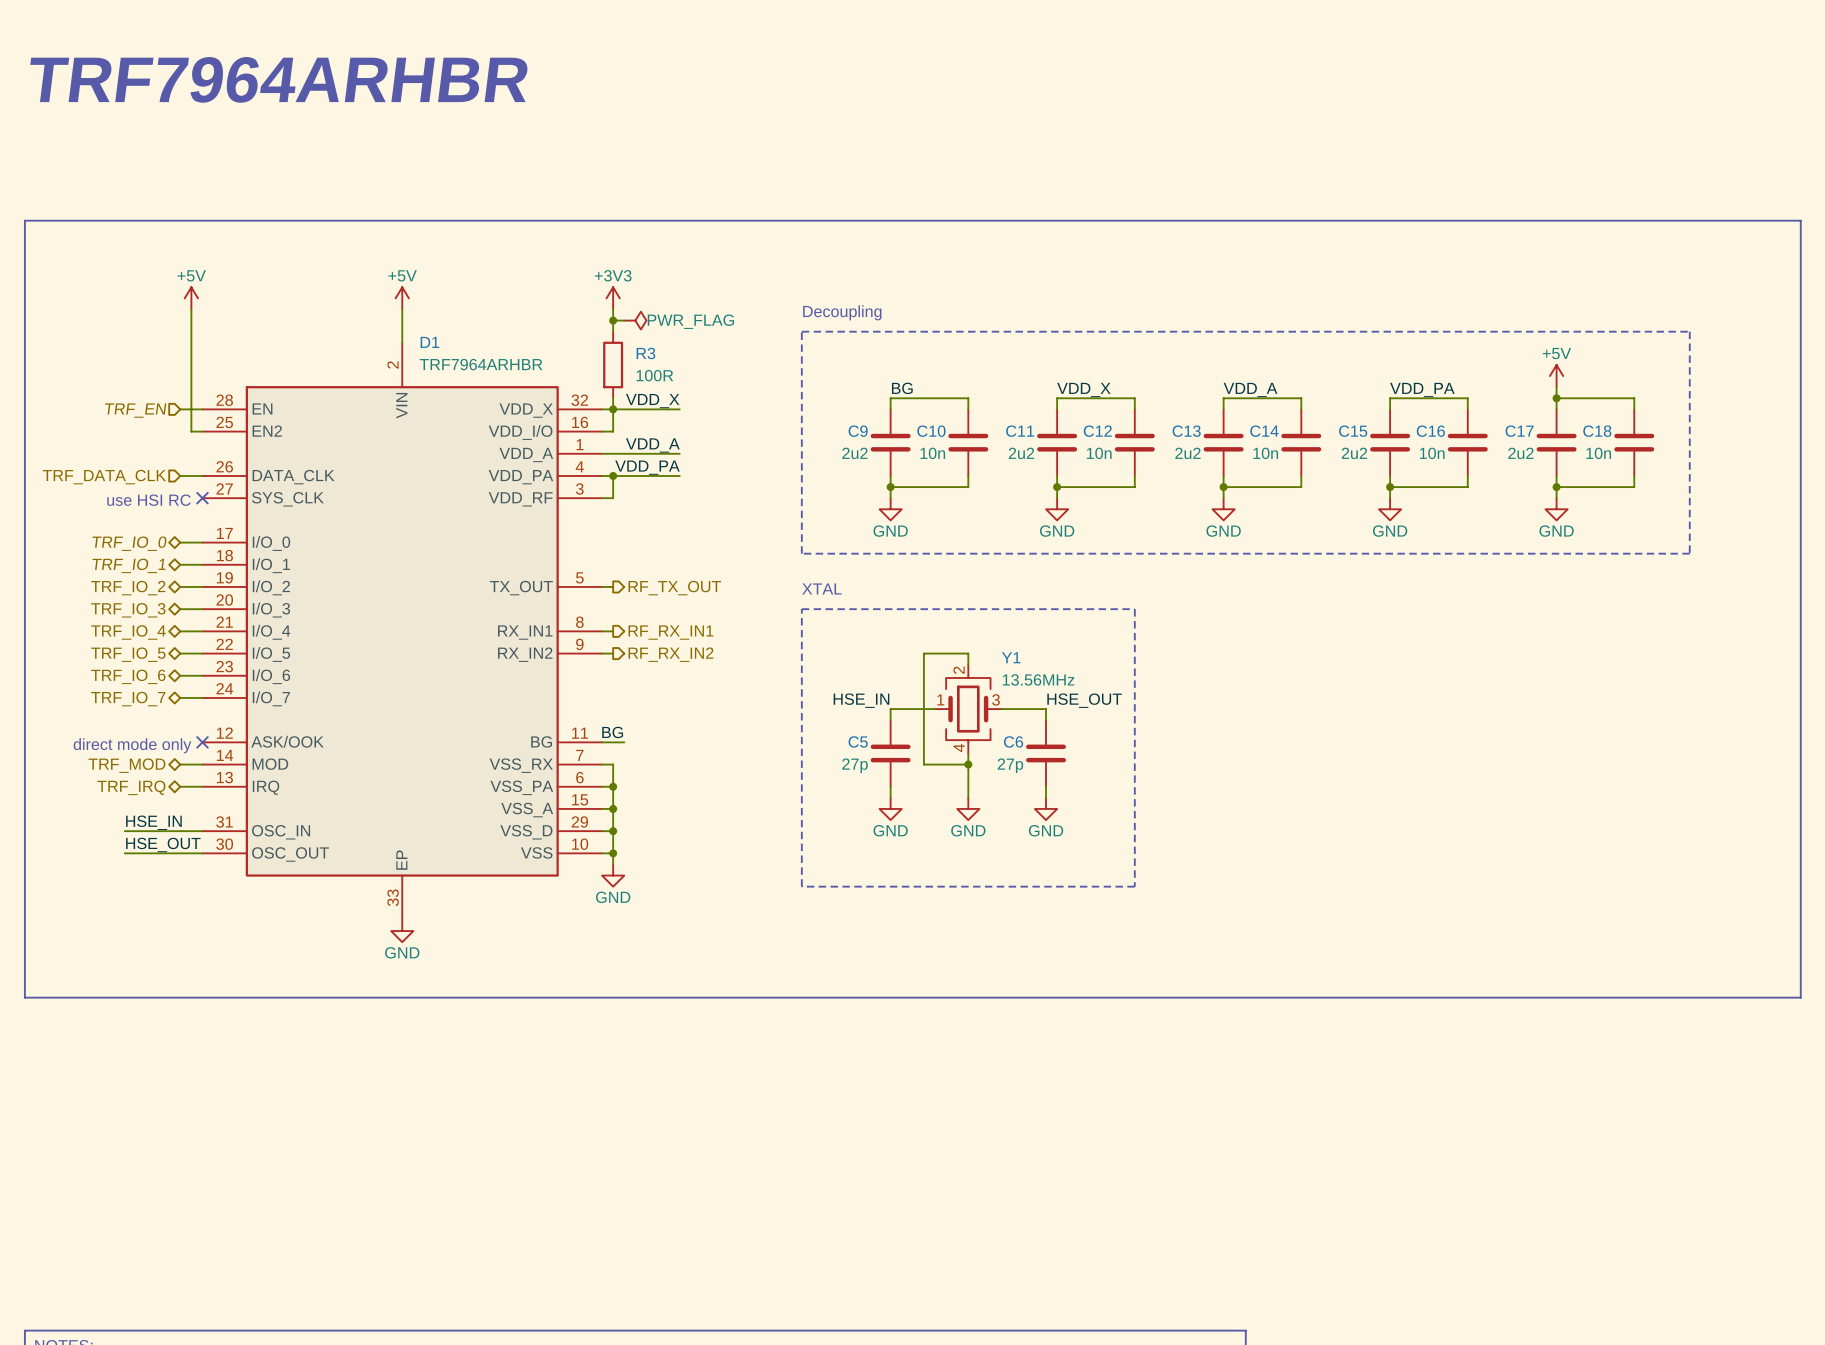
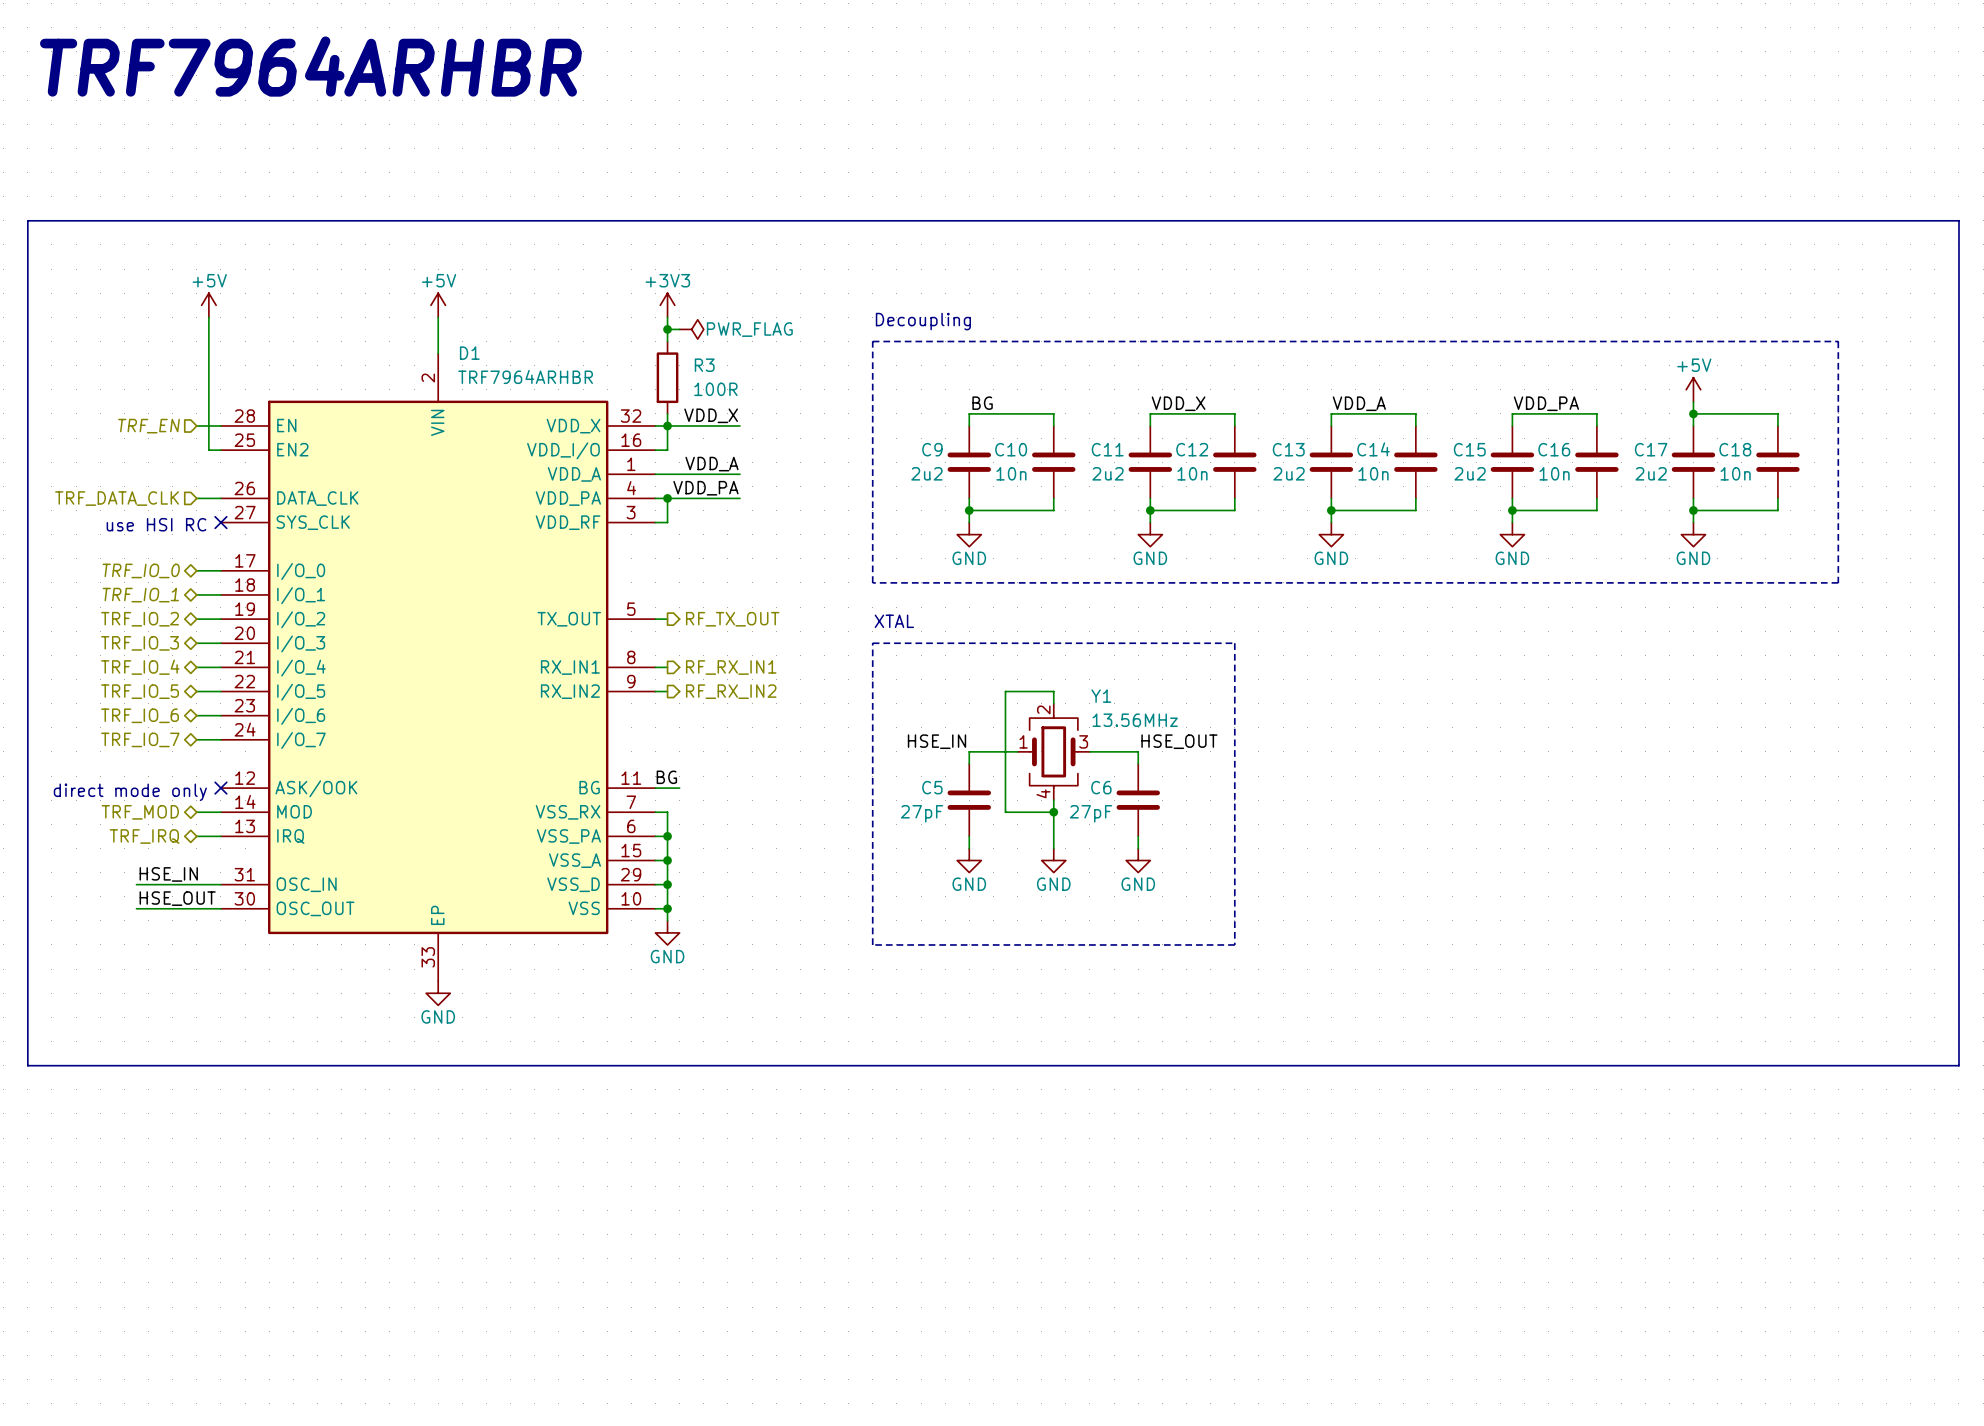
C5 value: 27p (855, 765) -> 27pF (922, 813)
C6 value: 27p (1010, 765) -> 27pF (1091, 813)

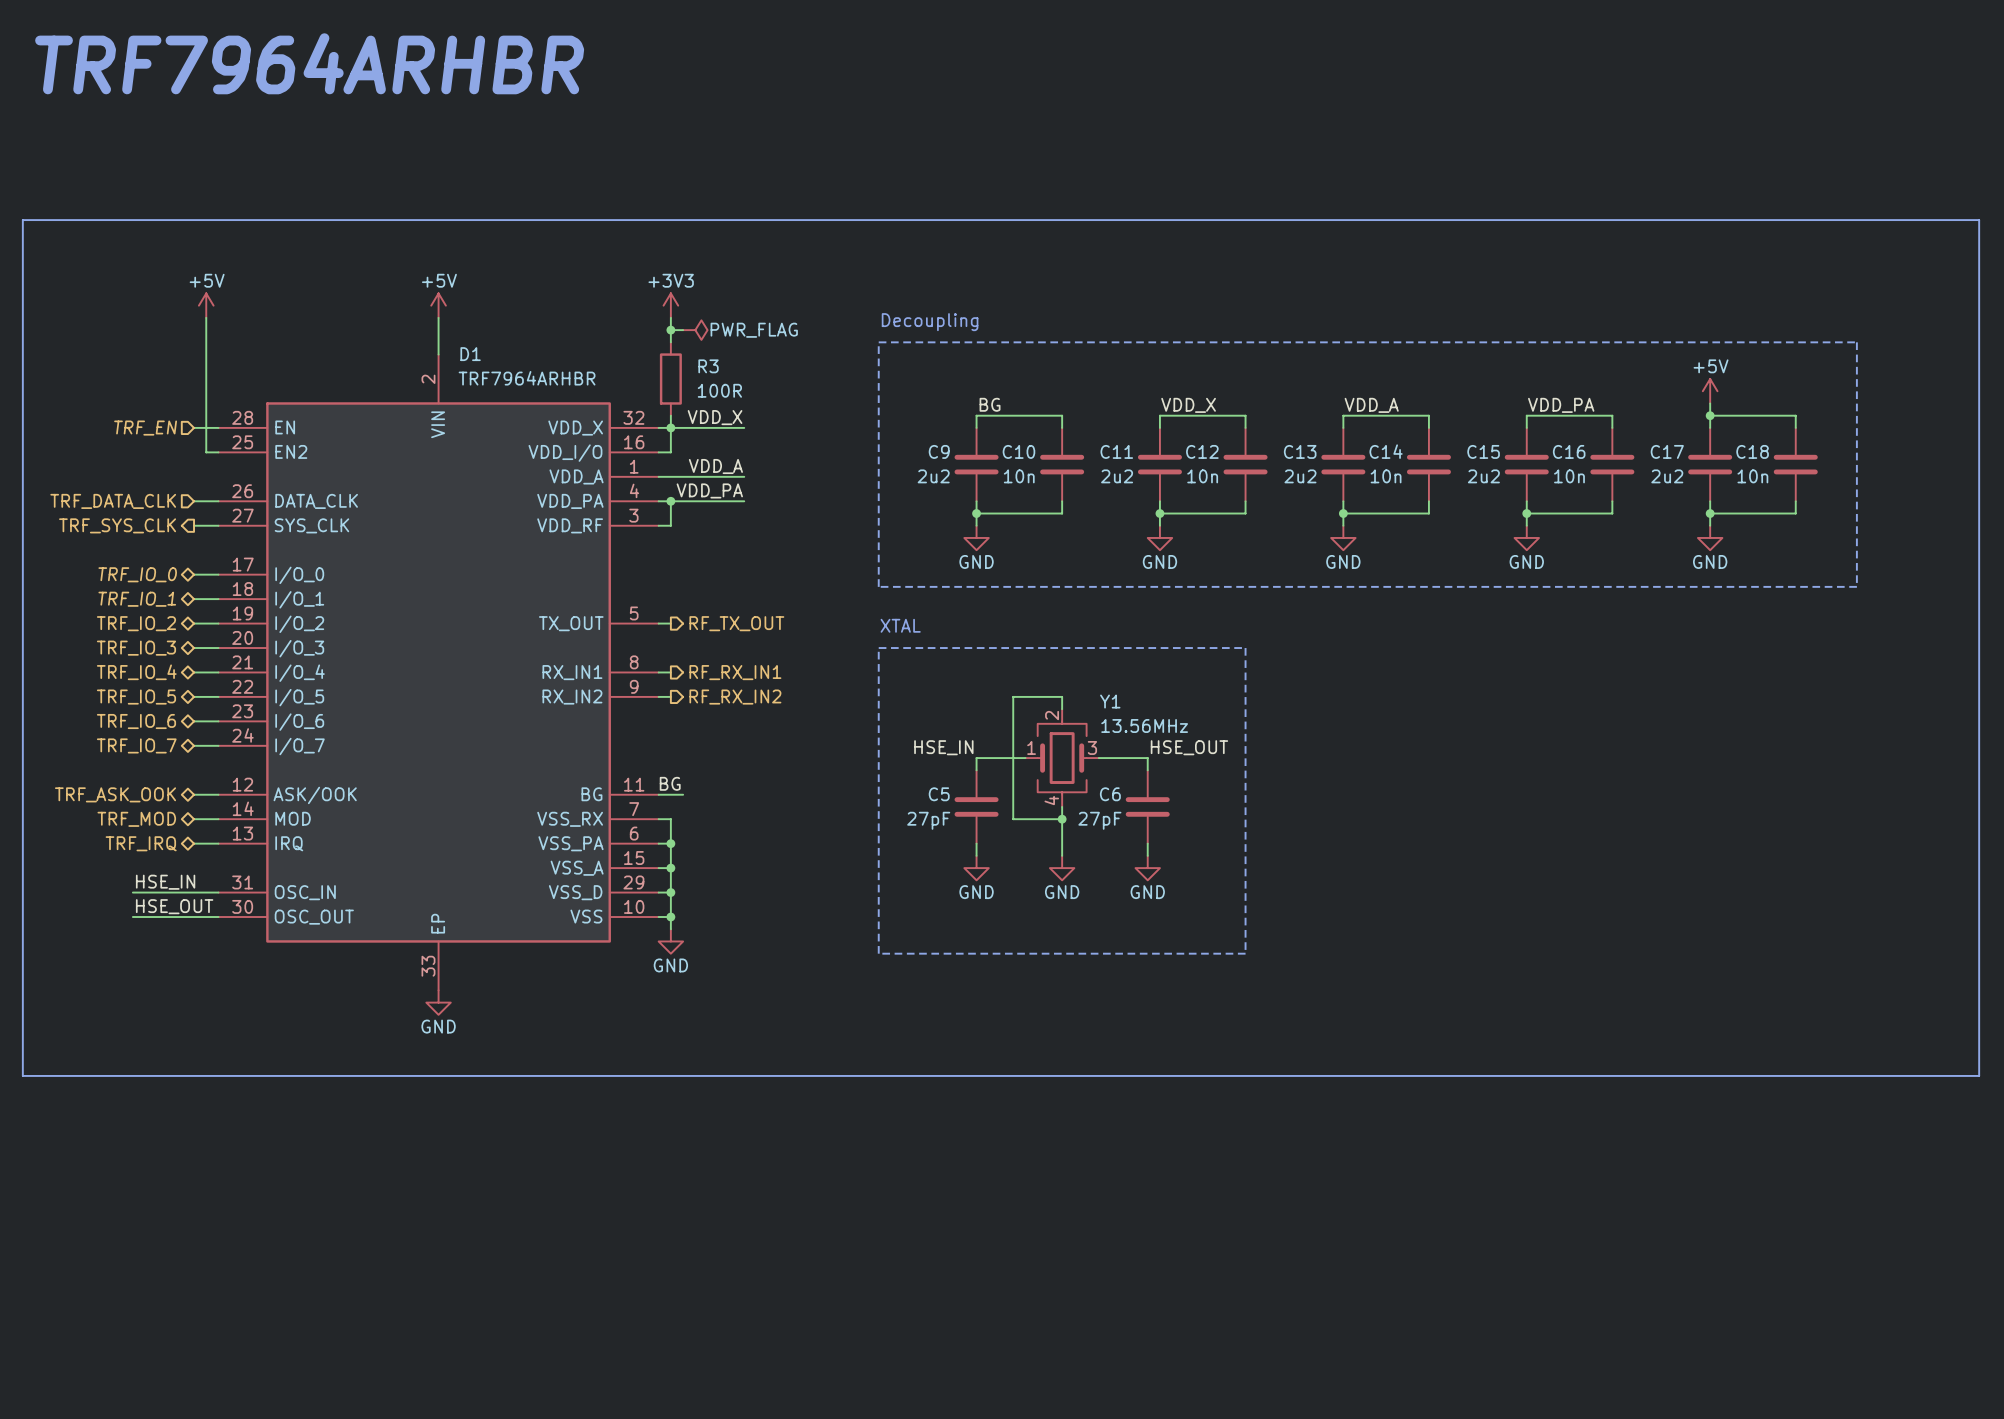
hierarchical label: none -> TRF_SYS_CLK (117, 525)
wire: none -> (194, 525) (218, 525)
no-connect mark: (220, 522) -> none
text: use HSI RC (156, 524) -> none
hierarchical label: none -> TRF_ASK_OOK (115, 794)
wire: none -> (194, 794) (218, 794)
no-connect mark: (220, 788) -> none
text: direct mode only (130, 792) -> none

